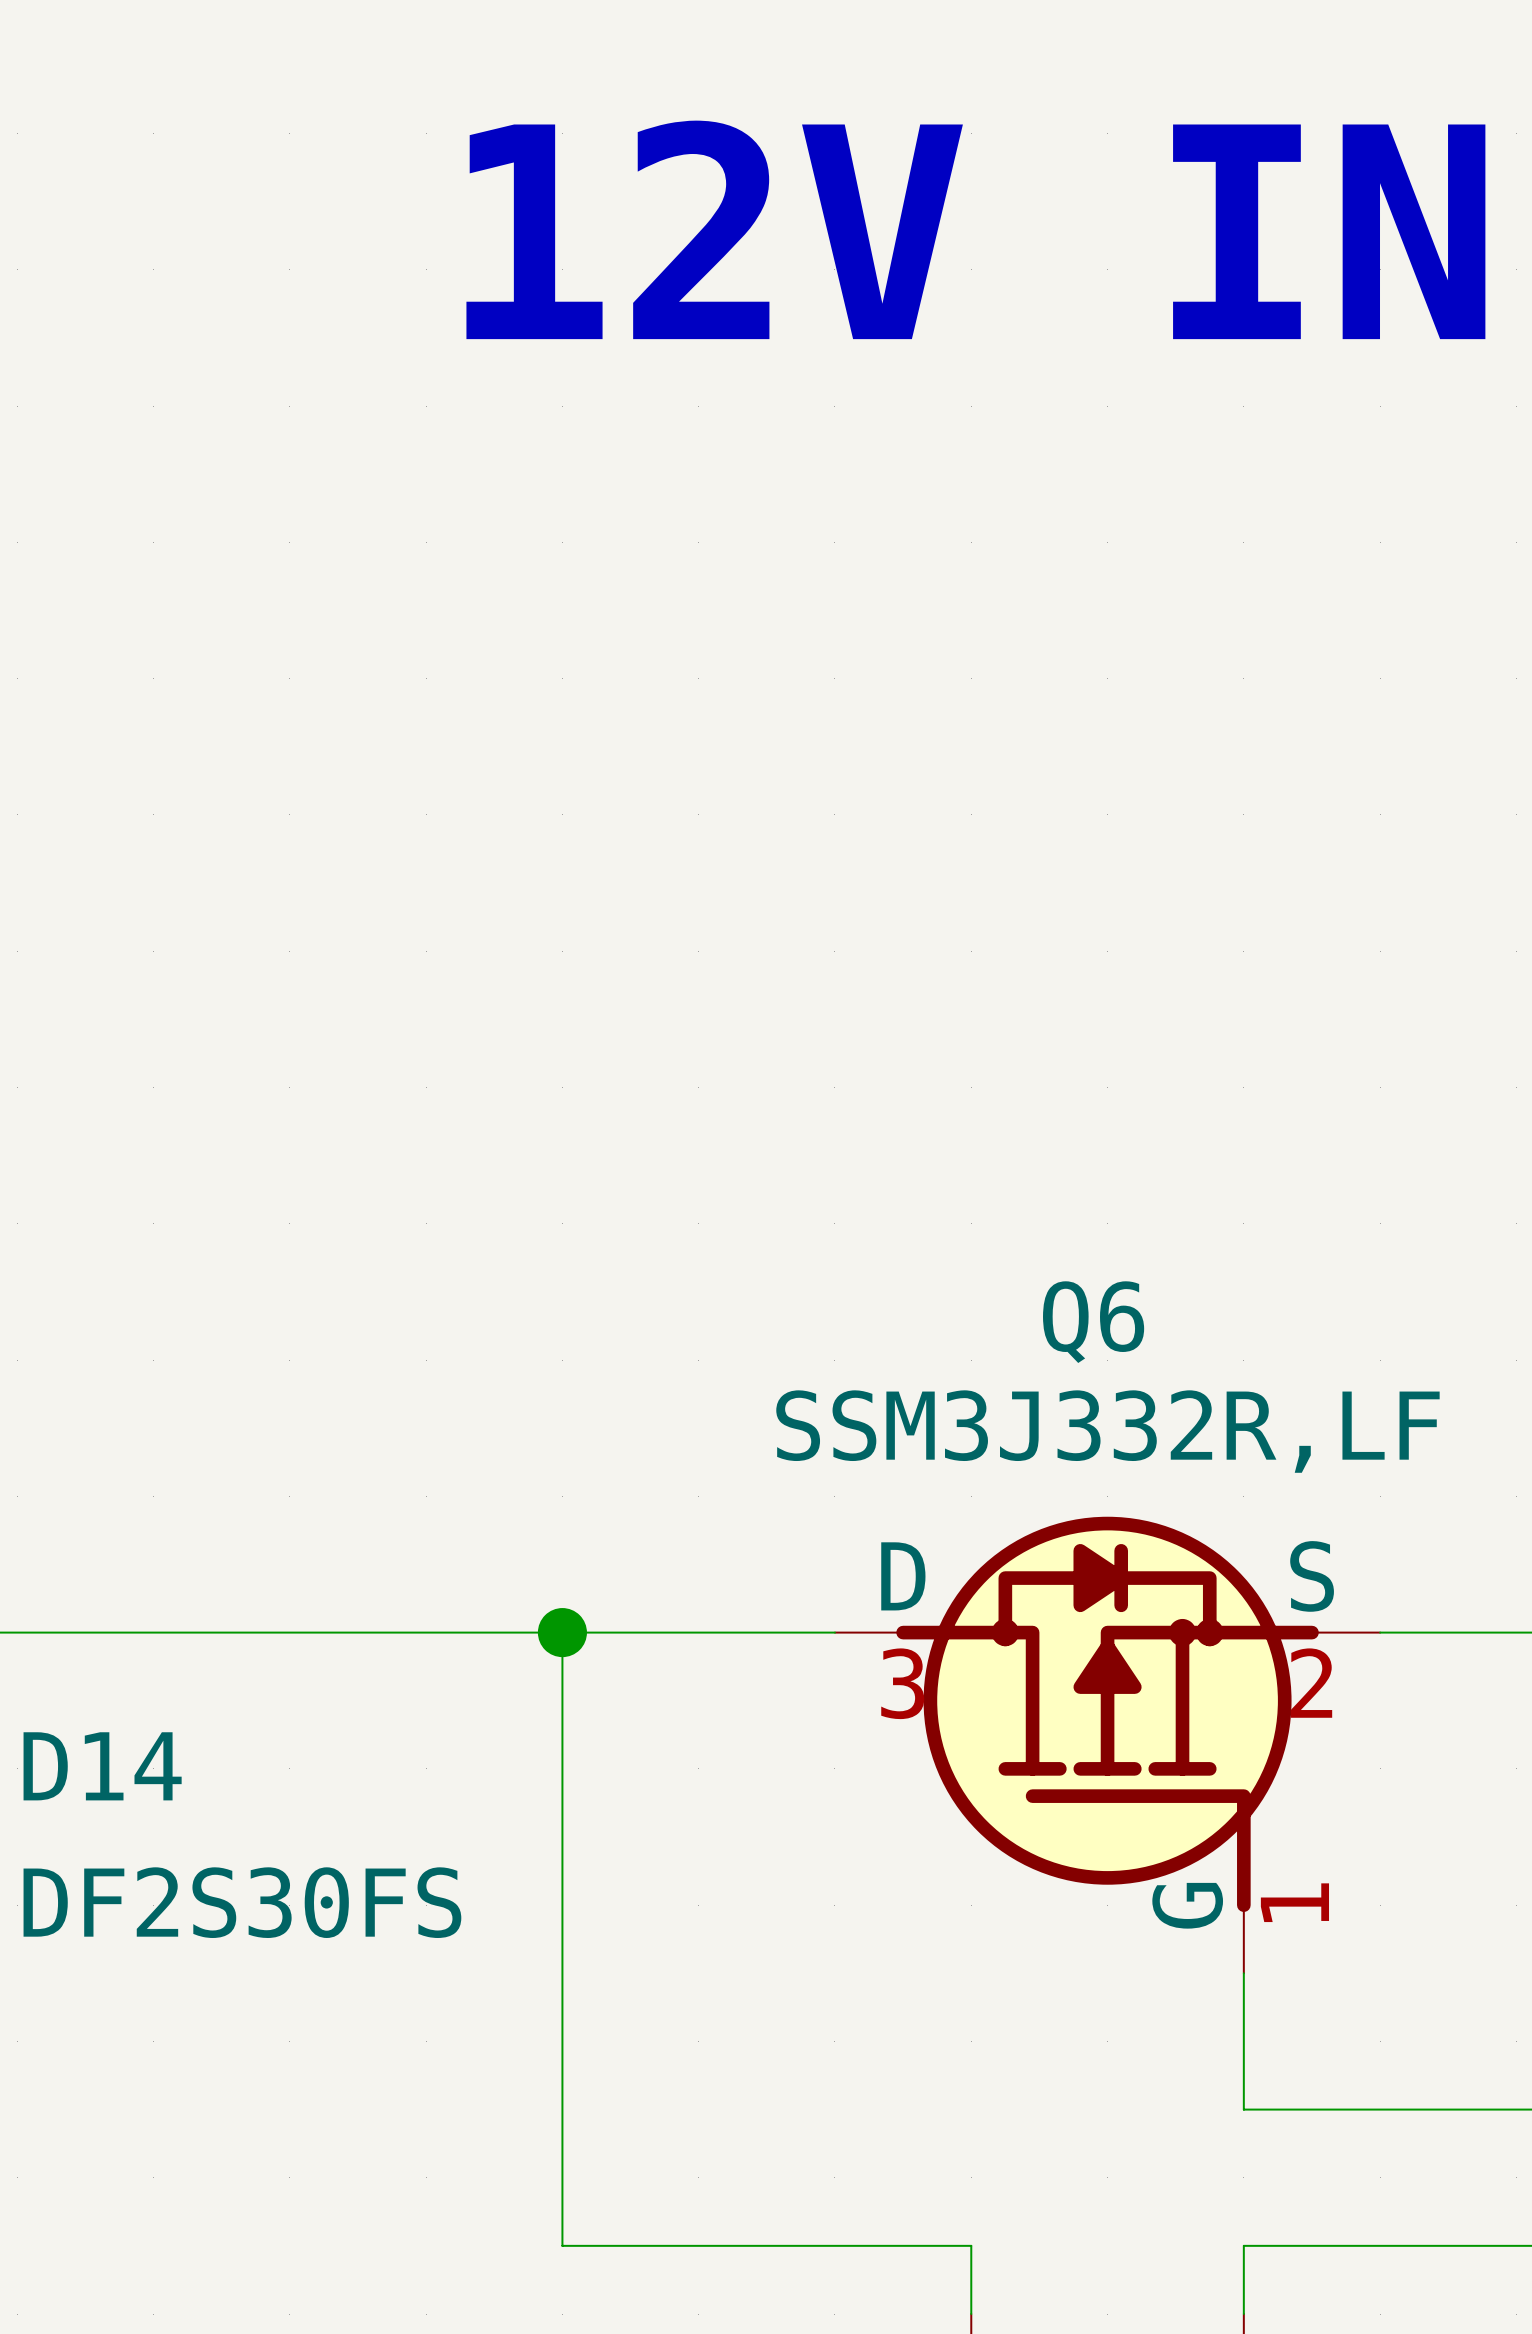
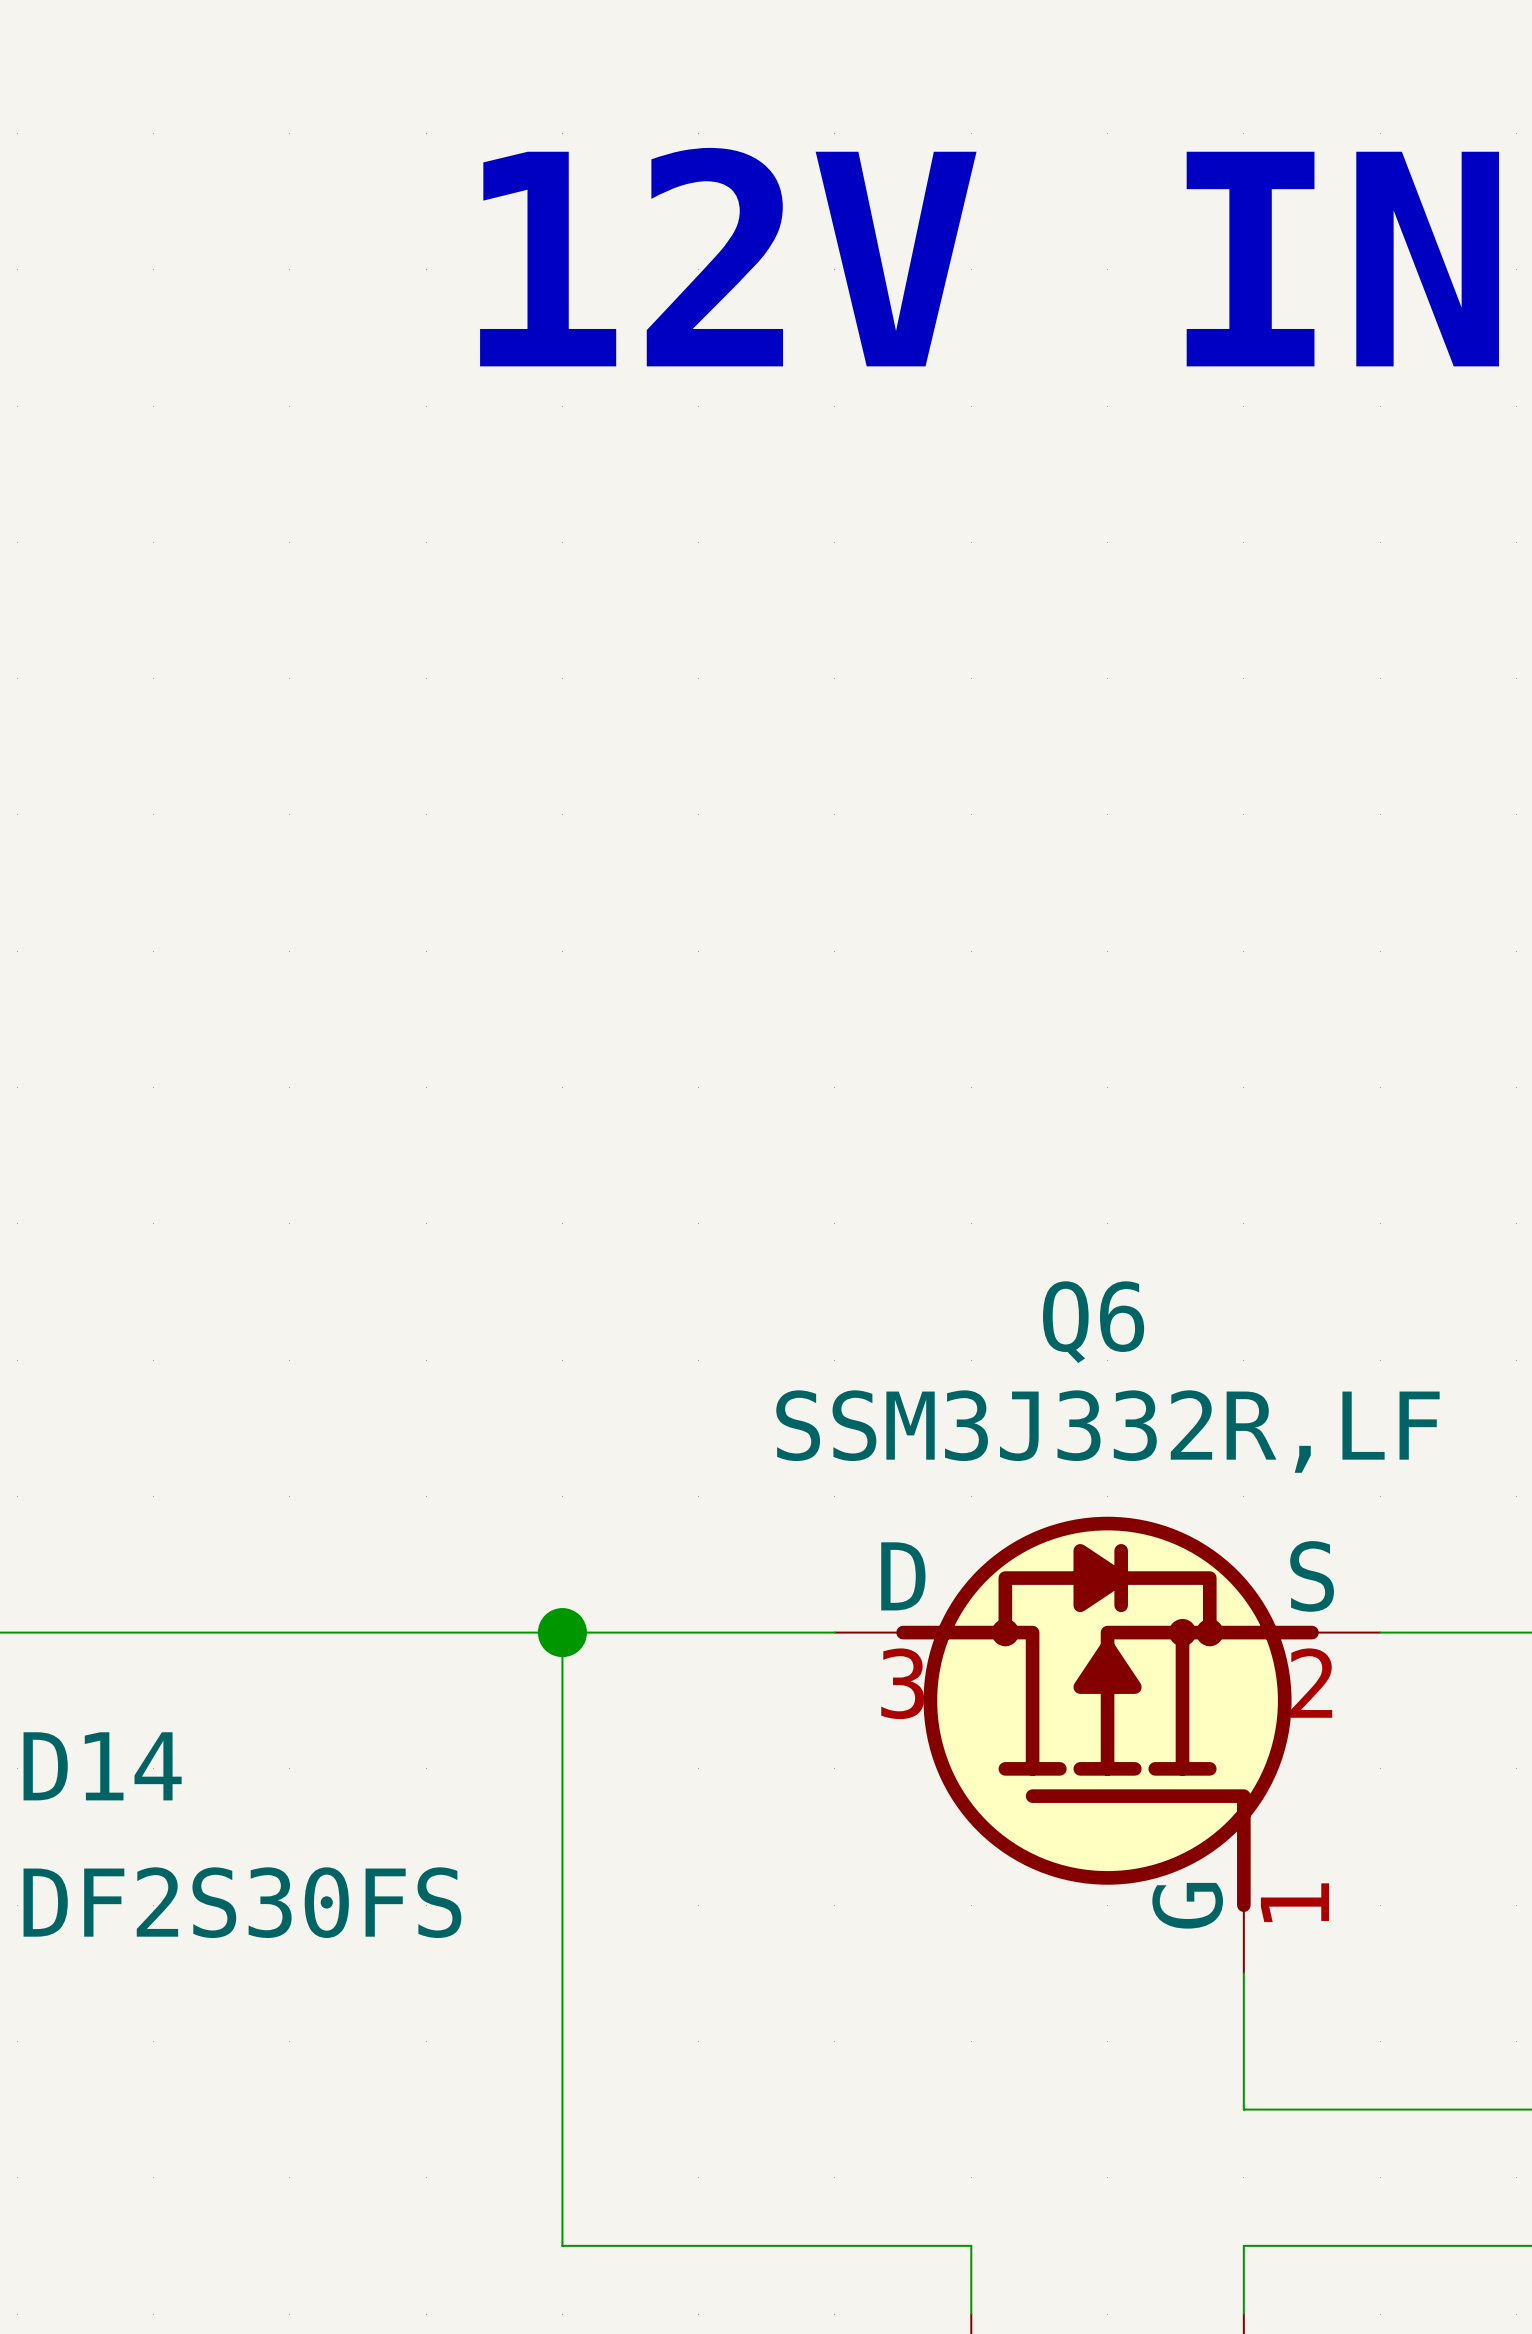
text position: 12V IN (975, 229) -> 12V IN (989, 257)

